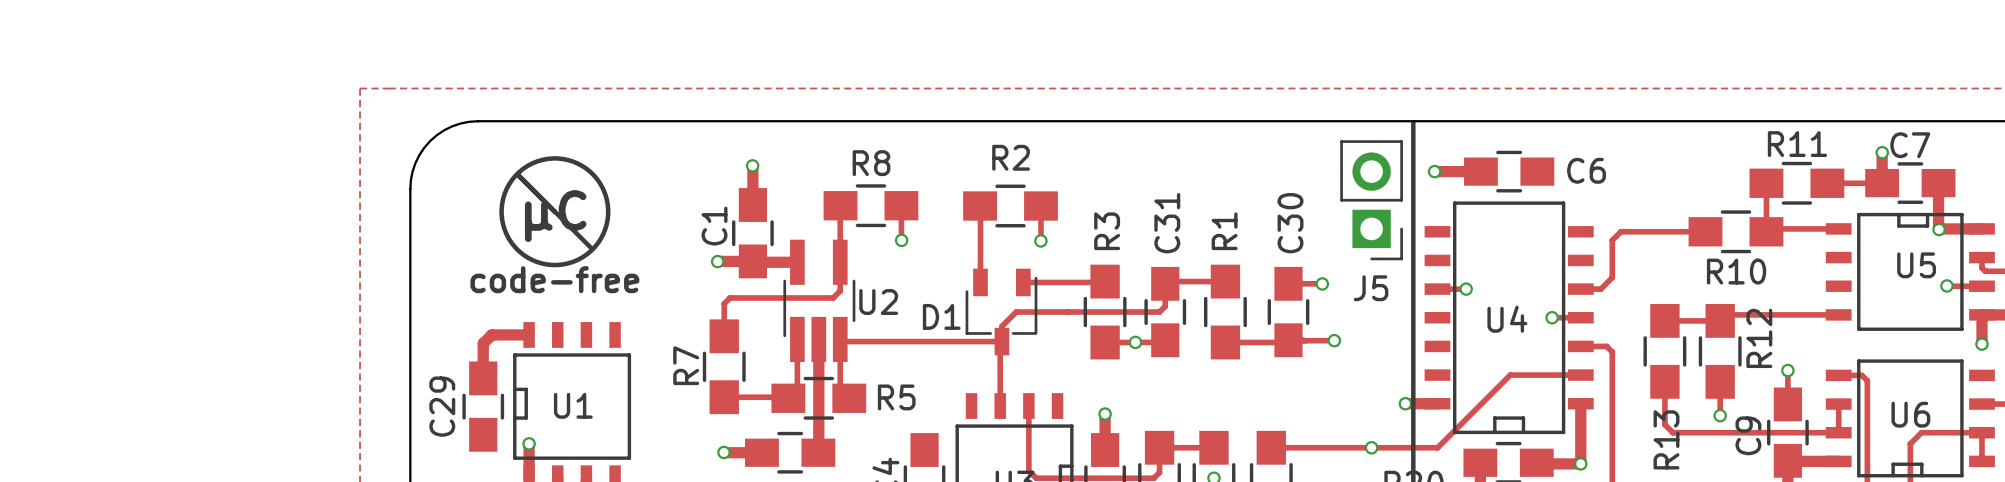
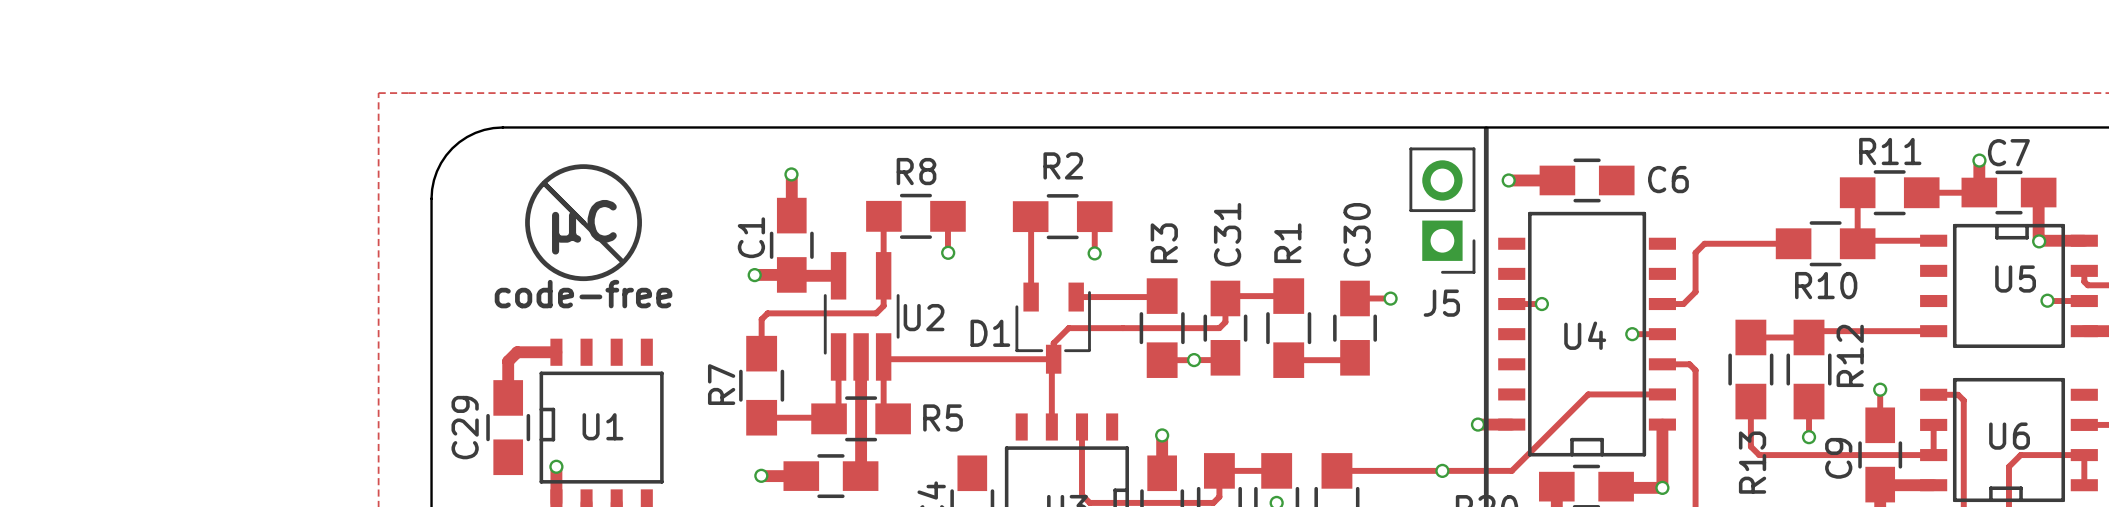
track: (1981, 314) (1981, 344) -> none
track: (1288, 340) (1334, 340) -> none
via: (1334, 340) -> none
via: (1981, 344) -> none

